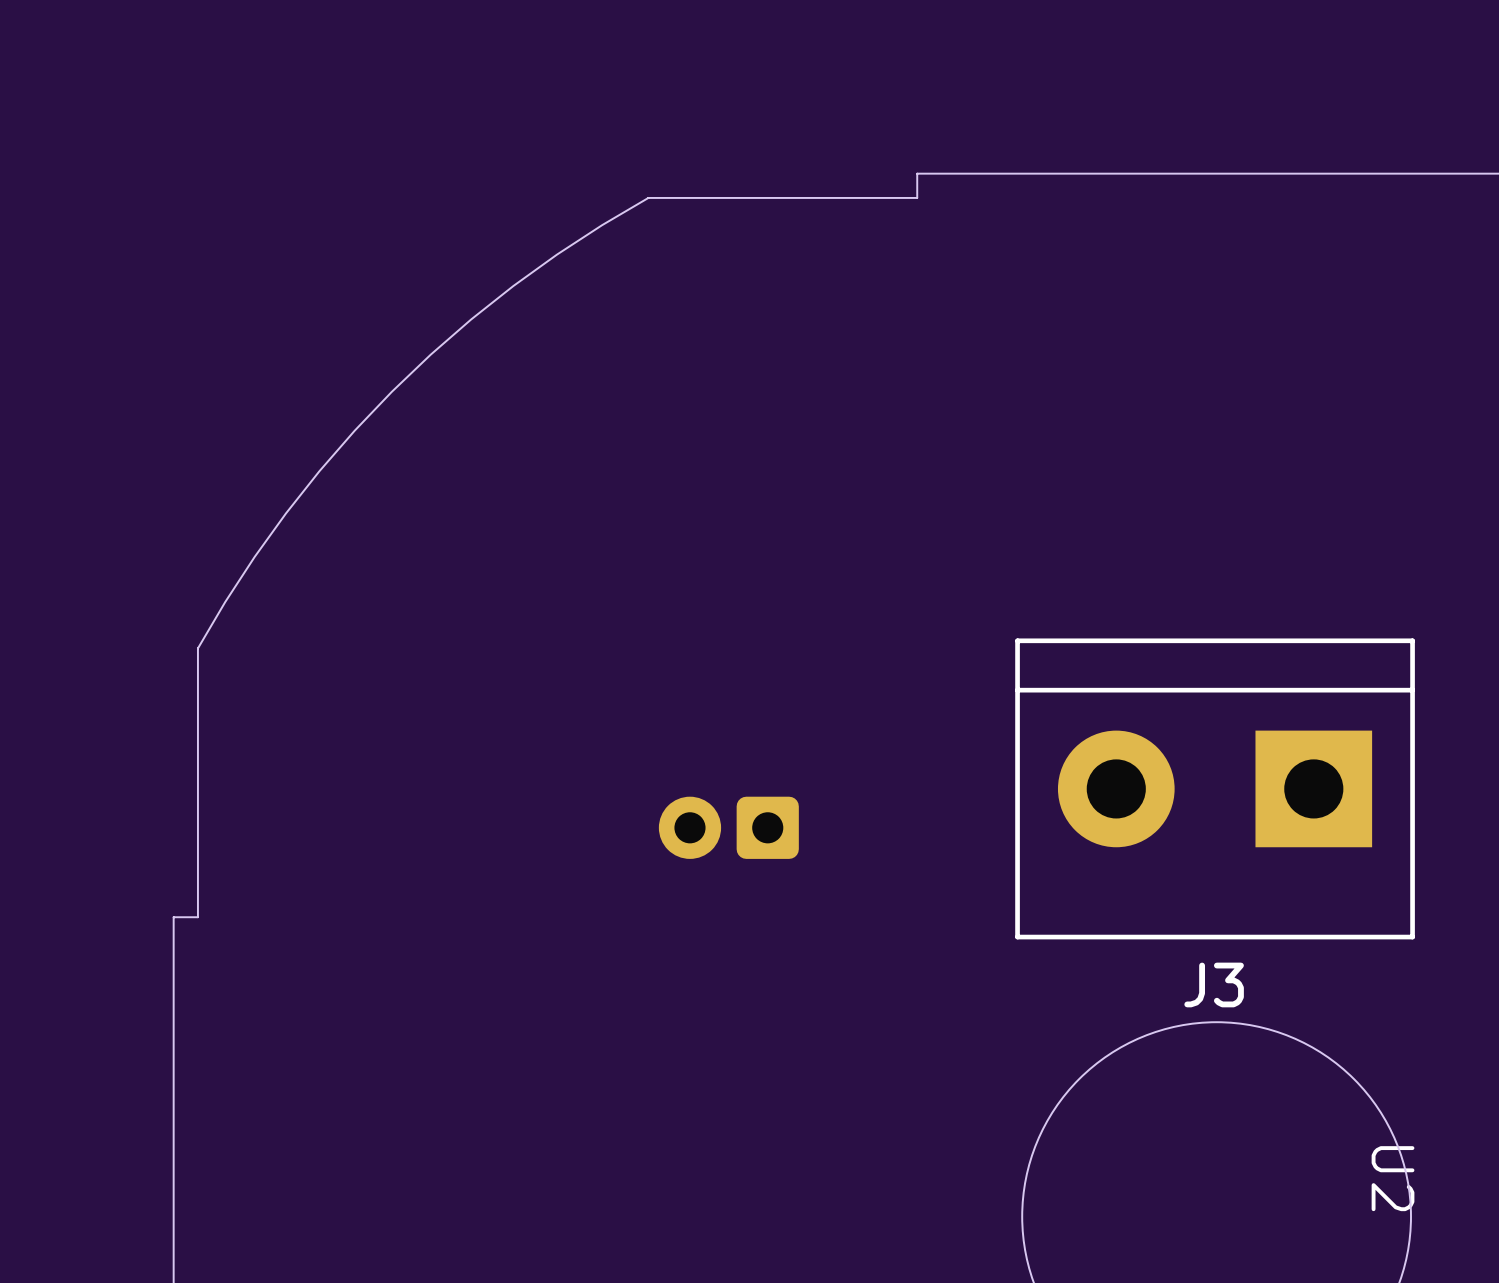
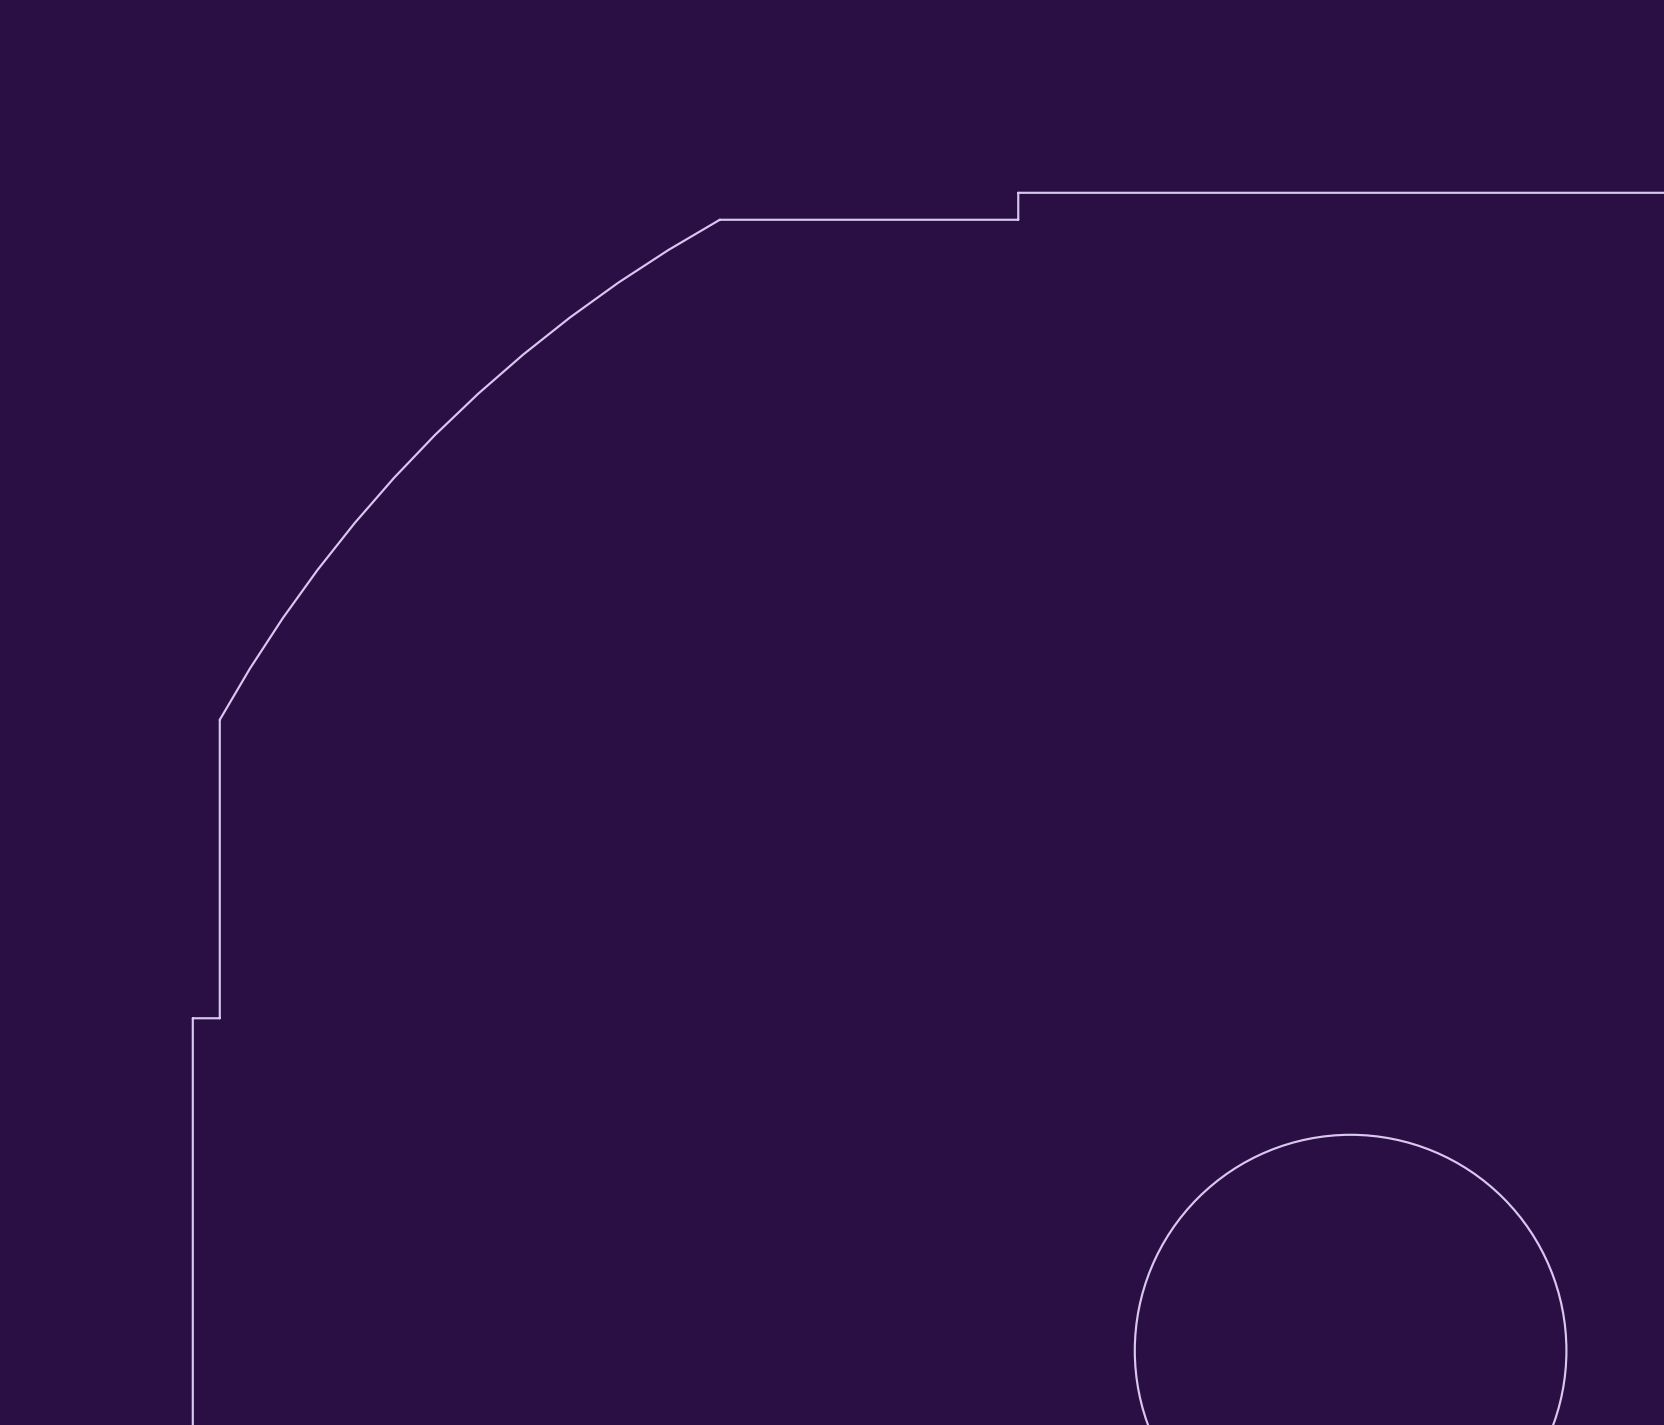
J3: (1215, 788) -> none
part: (728, 827) -> none
U2: (1393, 1178) -> none

